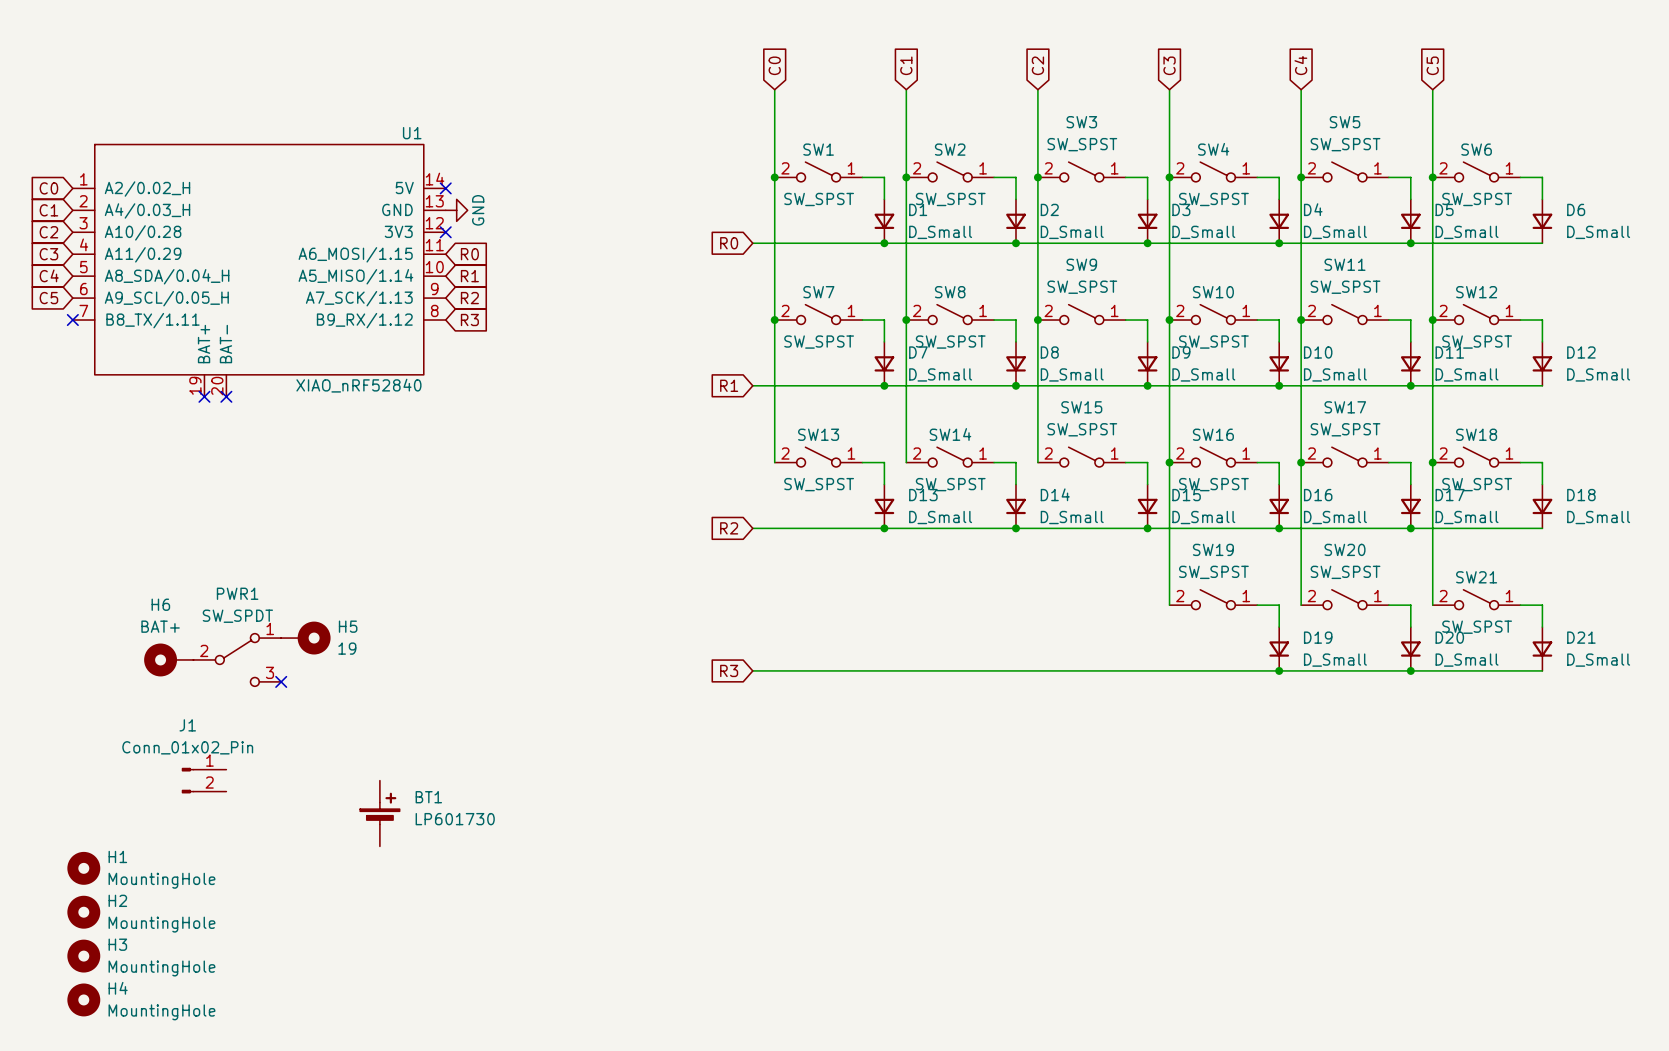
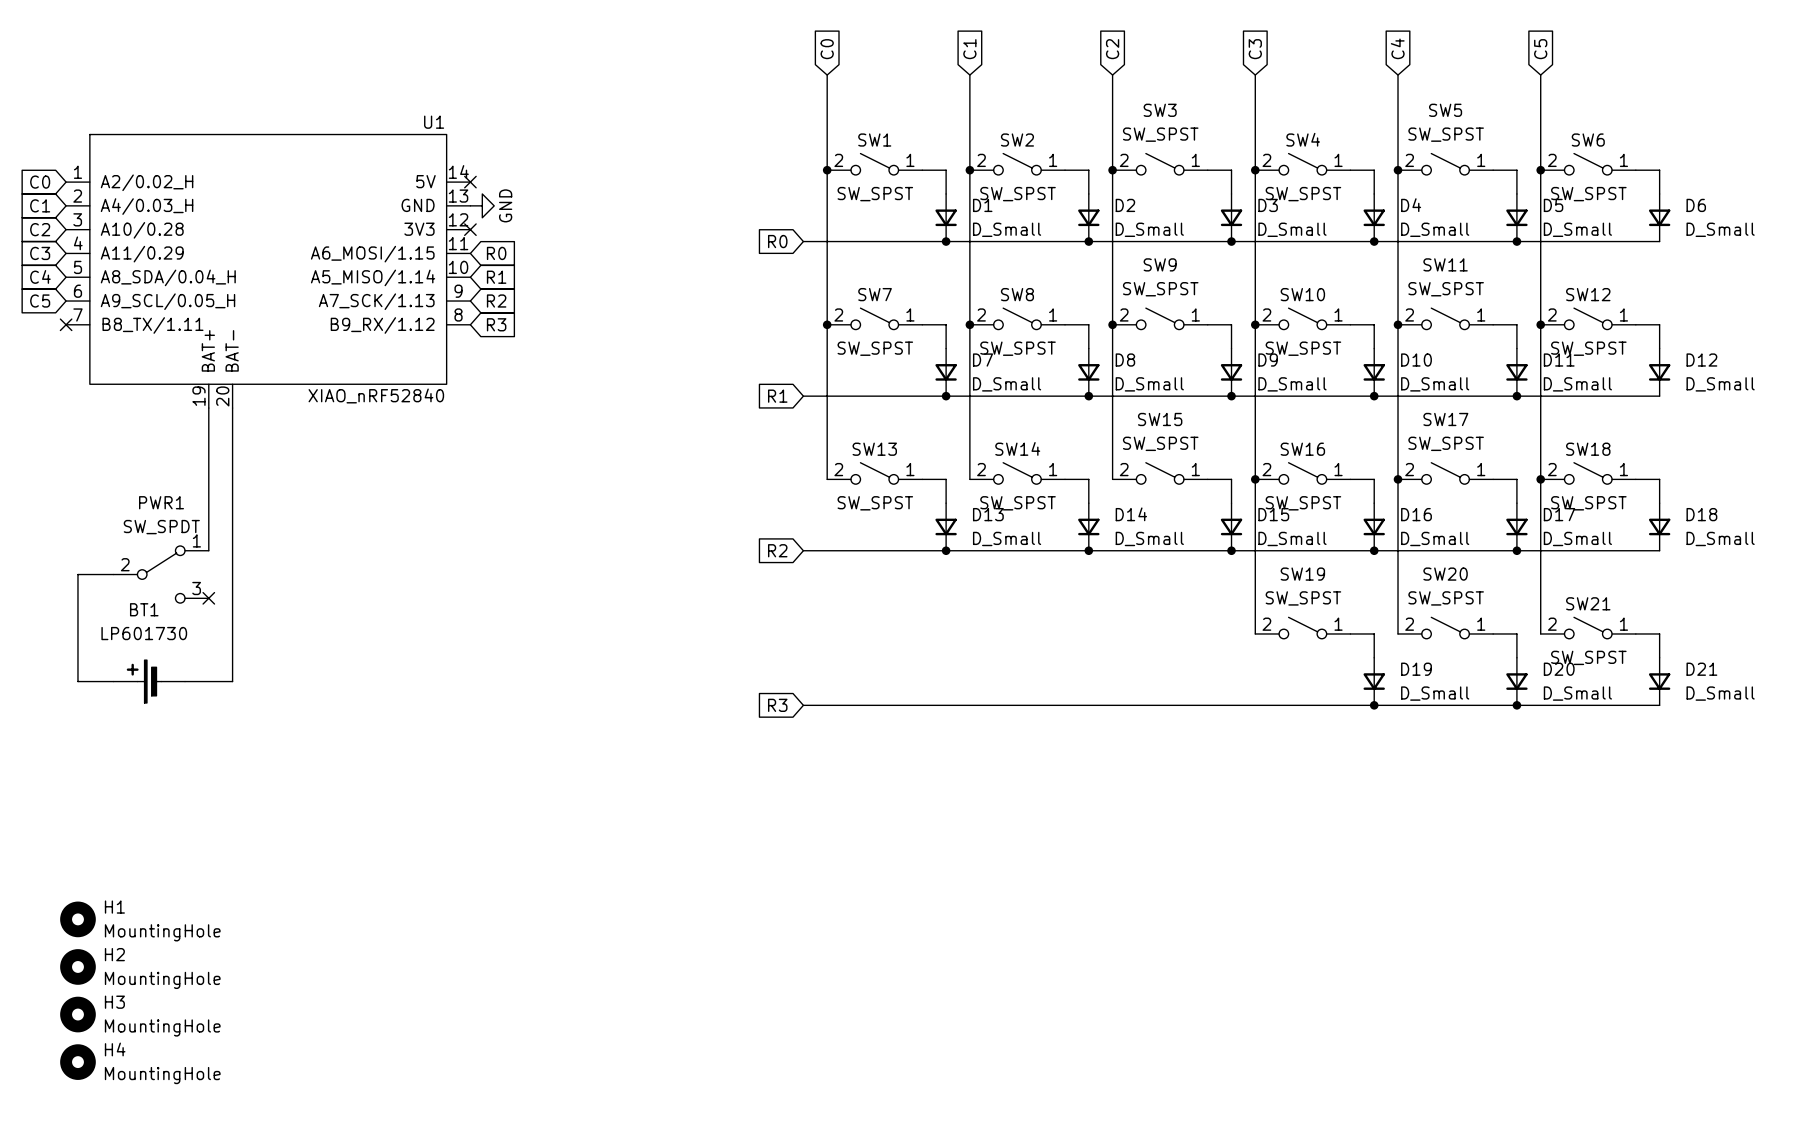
wire: none -> (208, 408) (208, 550)
no-connect mark: (204, 396) -> none
wire: none -> (232, 408) (232, 681) (185, 681)
no-connect mark: (226, 396) -> none
wire: none -> (113, 574) (77, 574) (77, 681) (113, 681)
no-connect mark: none -> (208, 598)
H5: 19 (305, 638) -> none
H6: BAT+ (168, 659) -> none
PWR1 position: (237, 659) -> (161, 574)
no-connect mark: (281, 681) -> none
J1: Conn_01x02_Pin (204, 780) -> none
BT1 name position: BT1 (428, 797) -> BT1 (144, 609)
BT1 rotation: 0° (379, 808) -> 90° counterclockwise (143, 681)
BT1 position: (379, 813) -> (149, 681)
BT1 value position: LP601730 (455, 819) -> LP601730 (144, 633)

